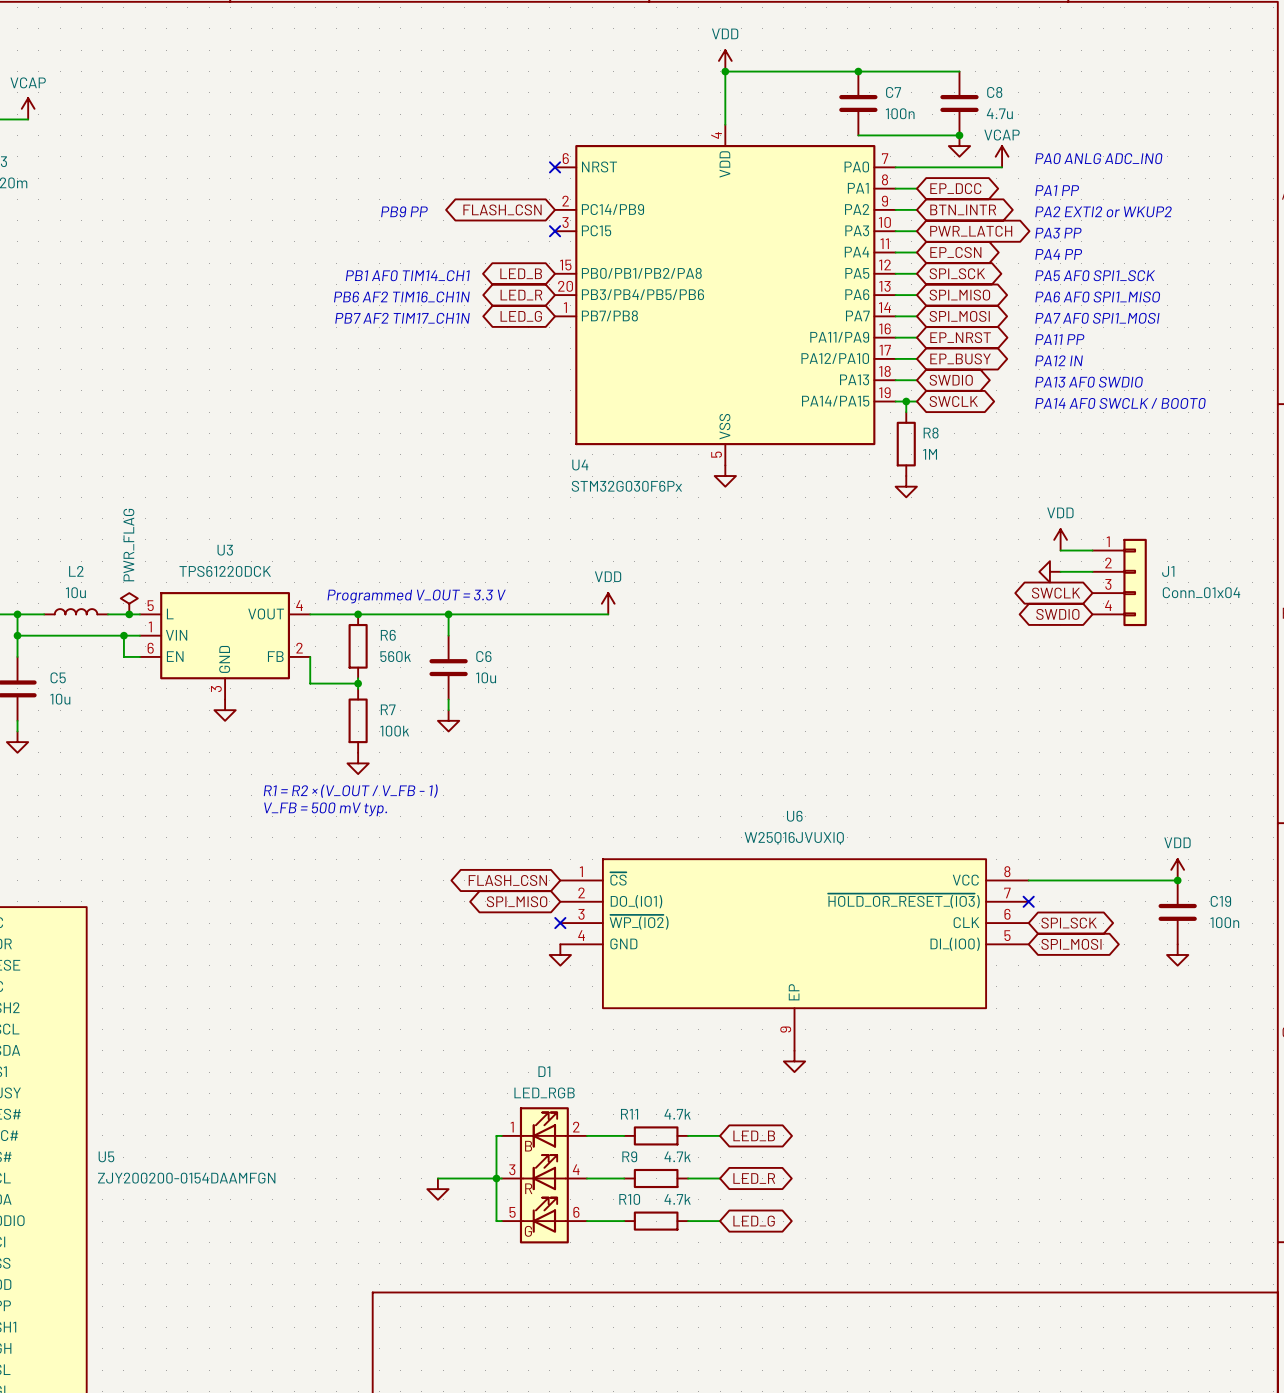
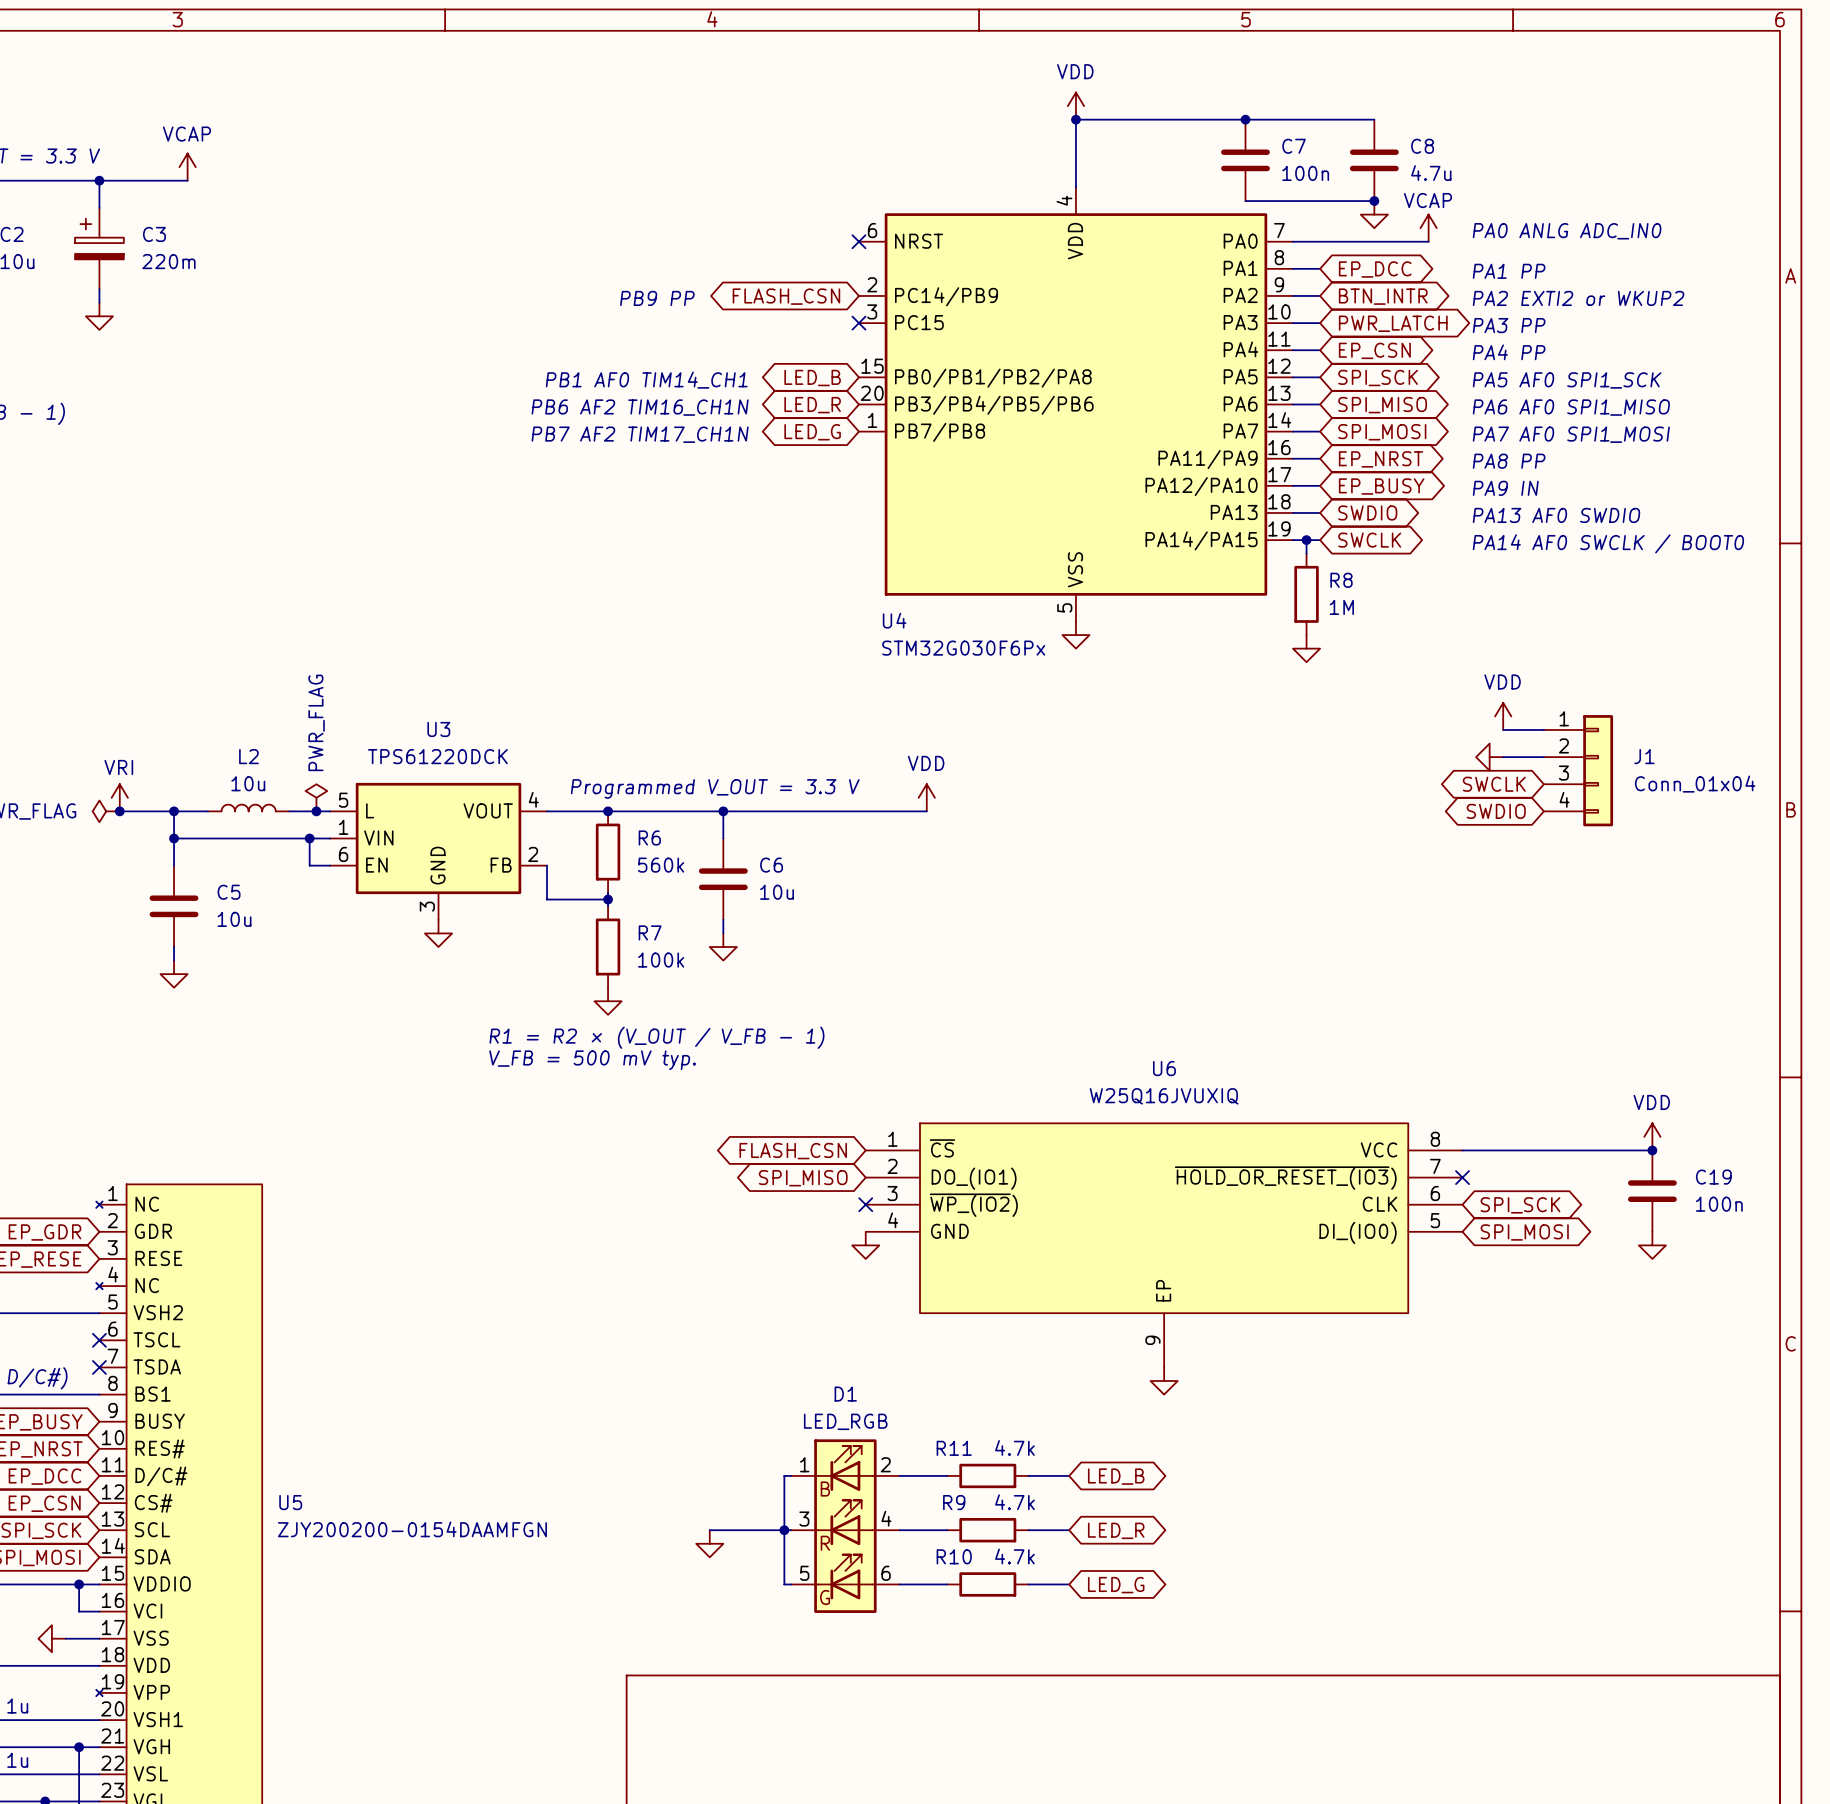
text: PA11 PP (1059, 339) -> PA8 PP (1509, 461)
text: PA12 IN (1059, 360) -> PA9 IN (1505, 488)

